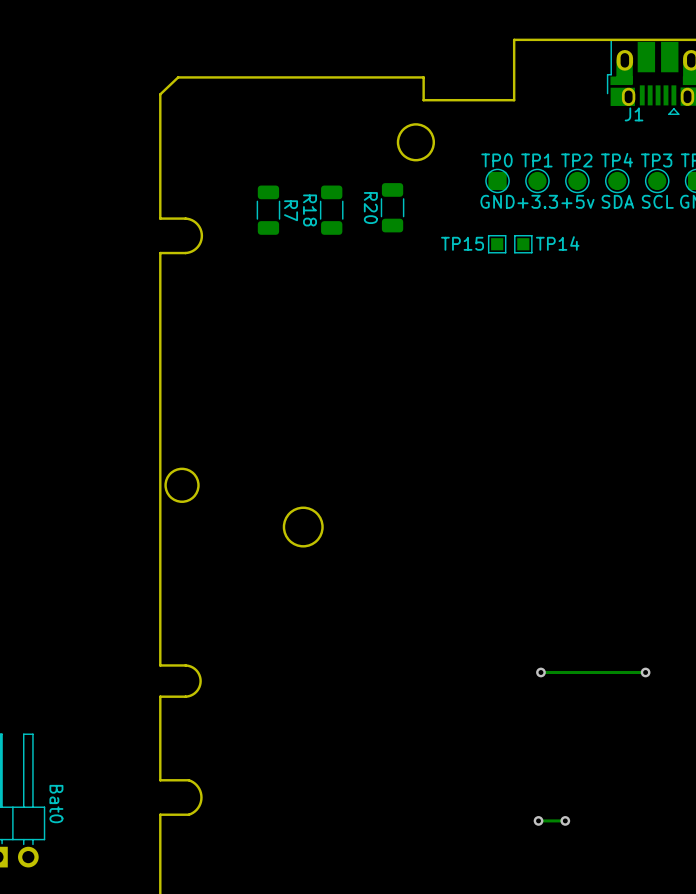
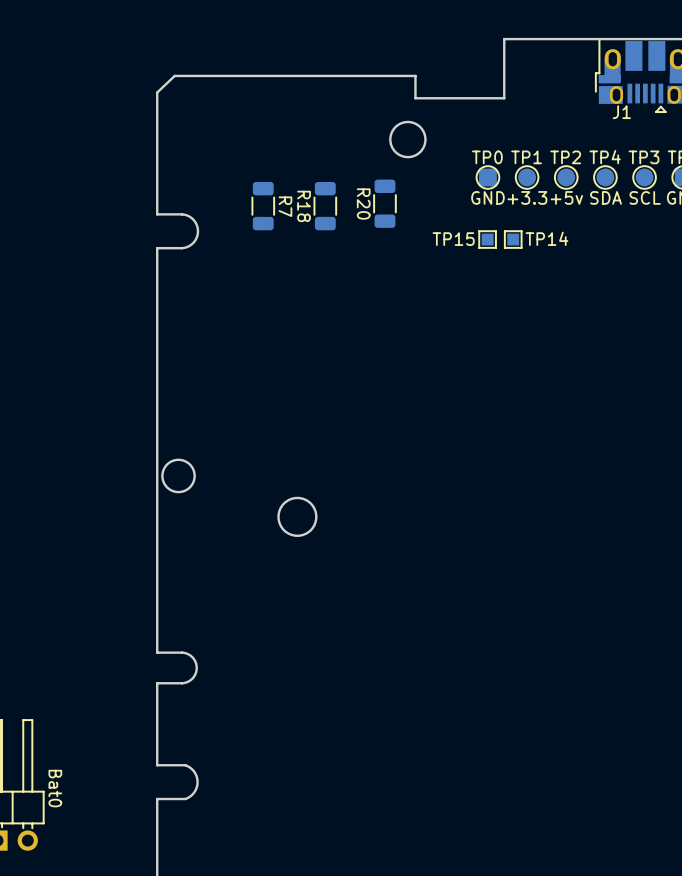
via: (540, 672) -> none
track: (645, 672) (540, 672) -> none
via: (645, 672) -> none
via: (538, 820) -> none
track: (565, 820) (538, 820) -> none
via: (565, 820) -> none

